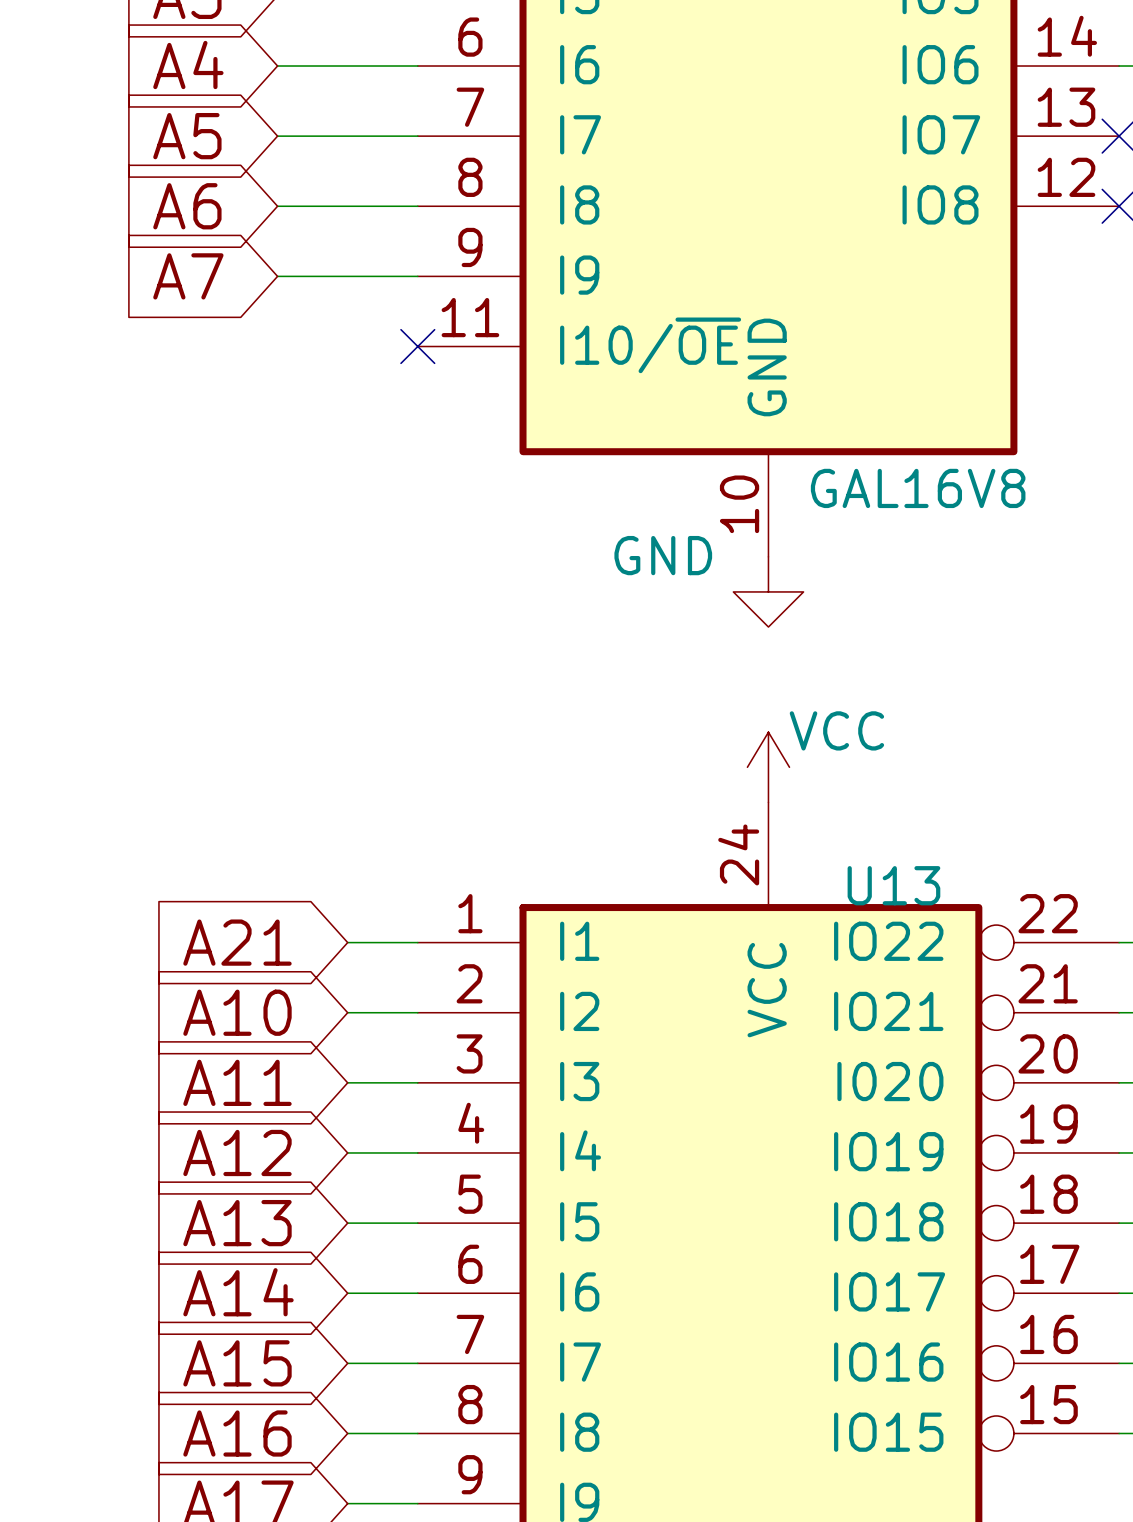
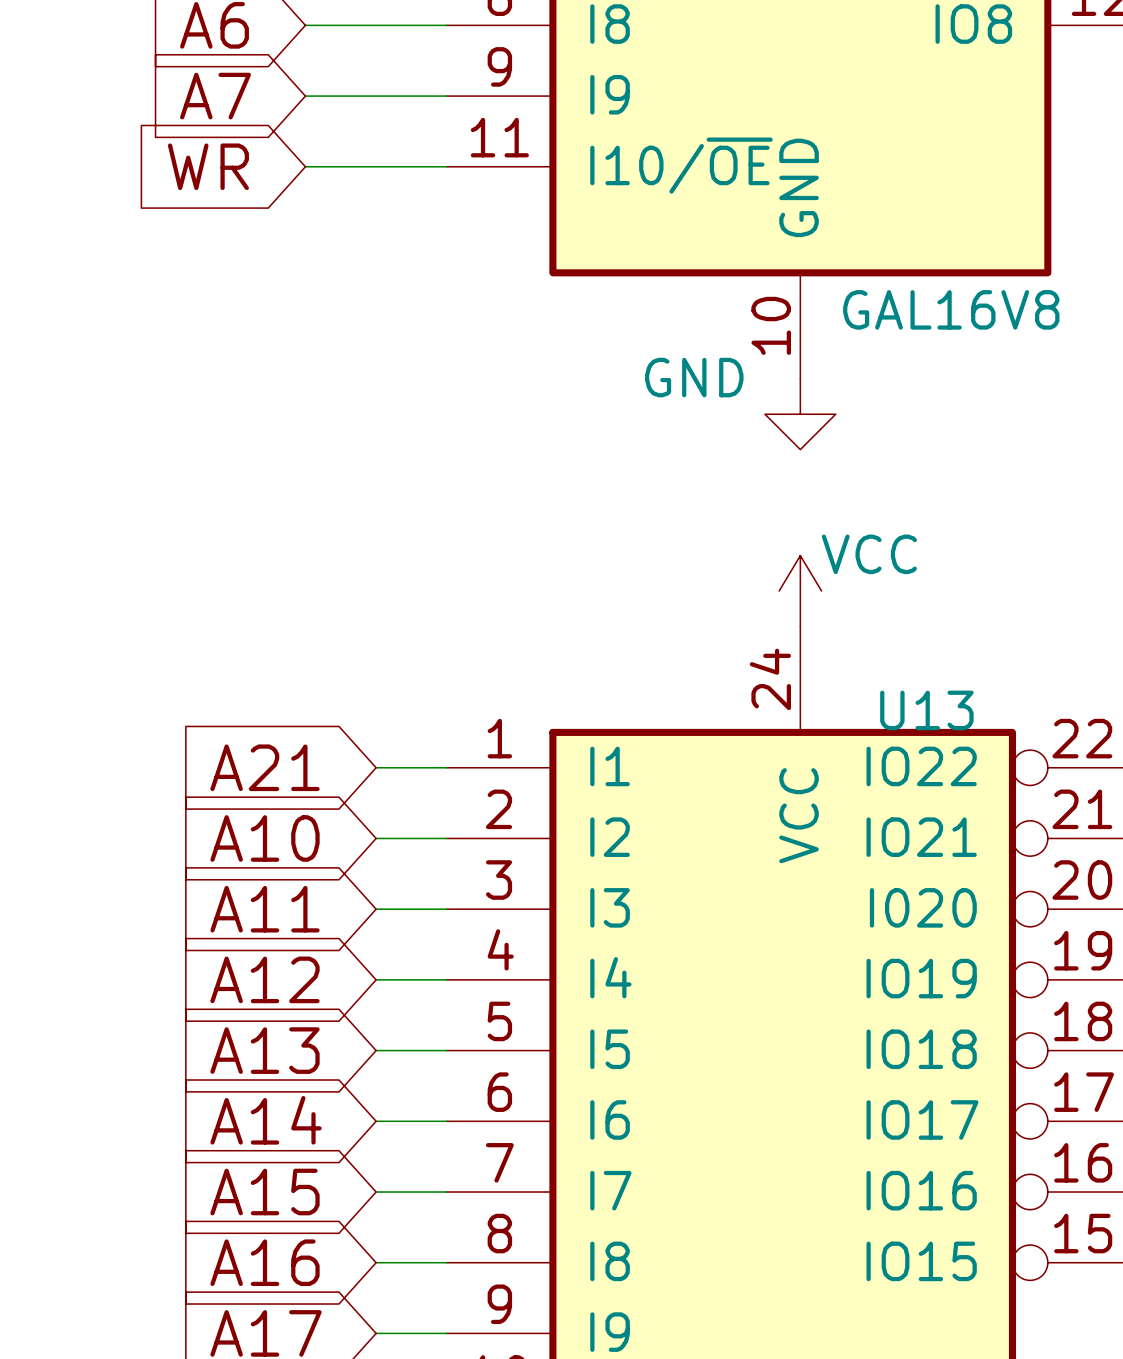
global label: none -> WR (208, 166)
wire: none -> (305, 166) (446, 166)
no-connect mark: (417, 346) -> none

